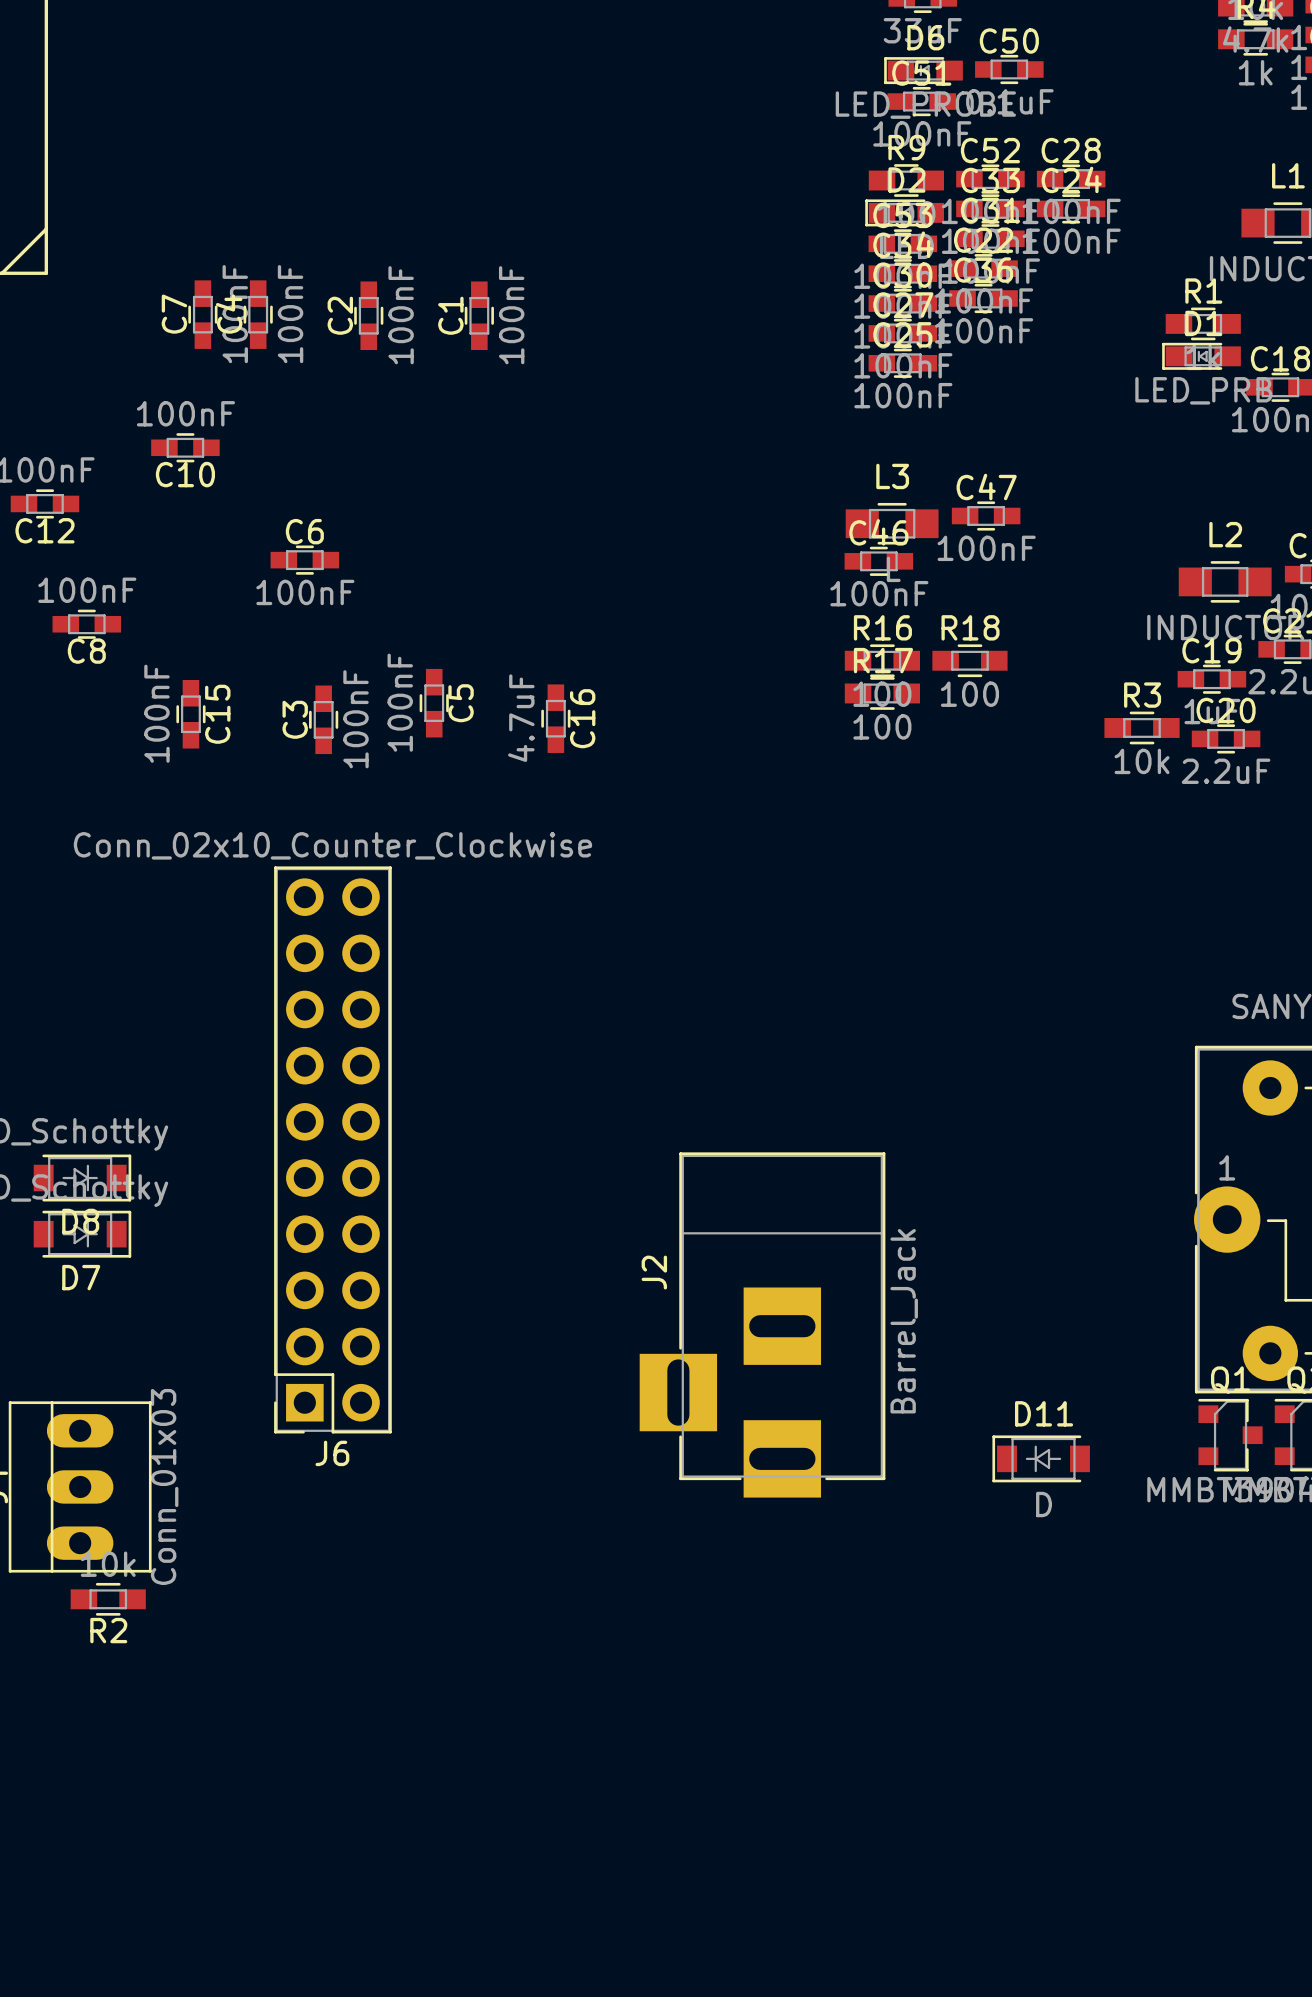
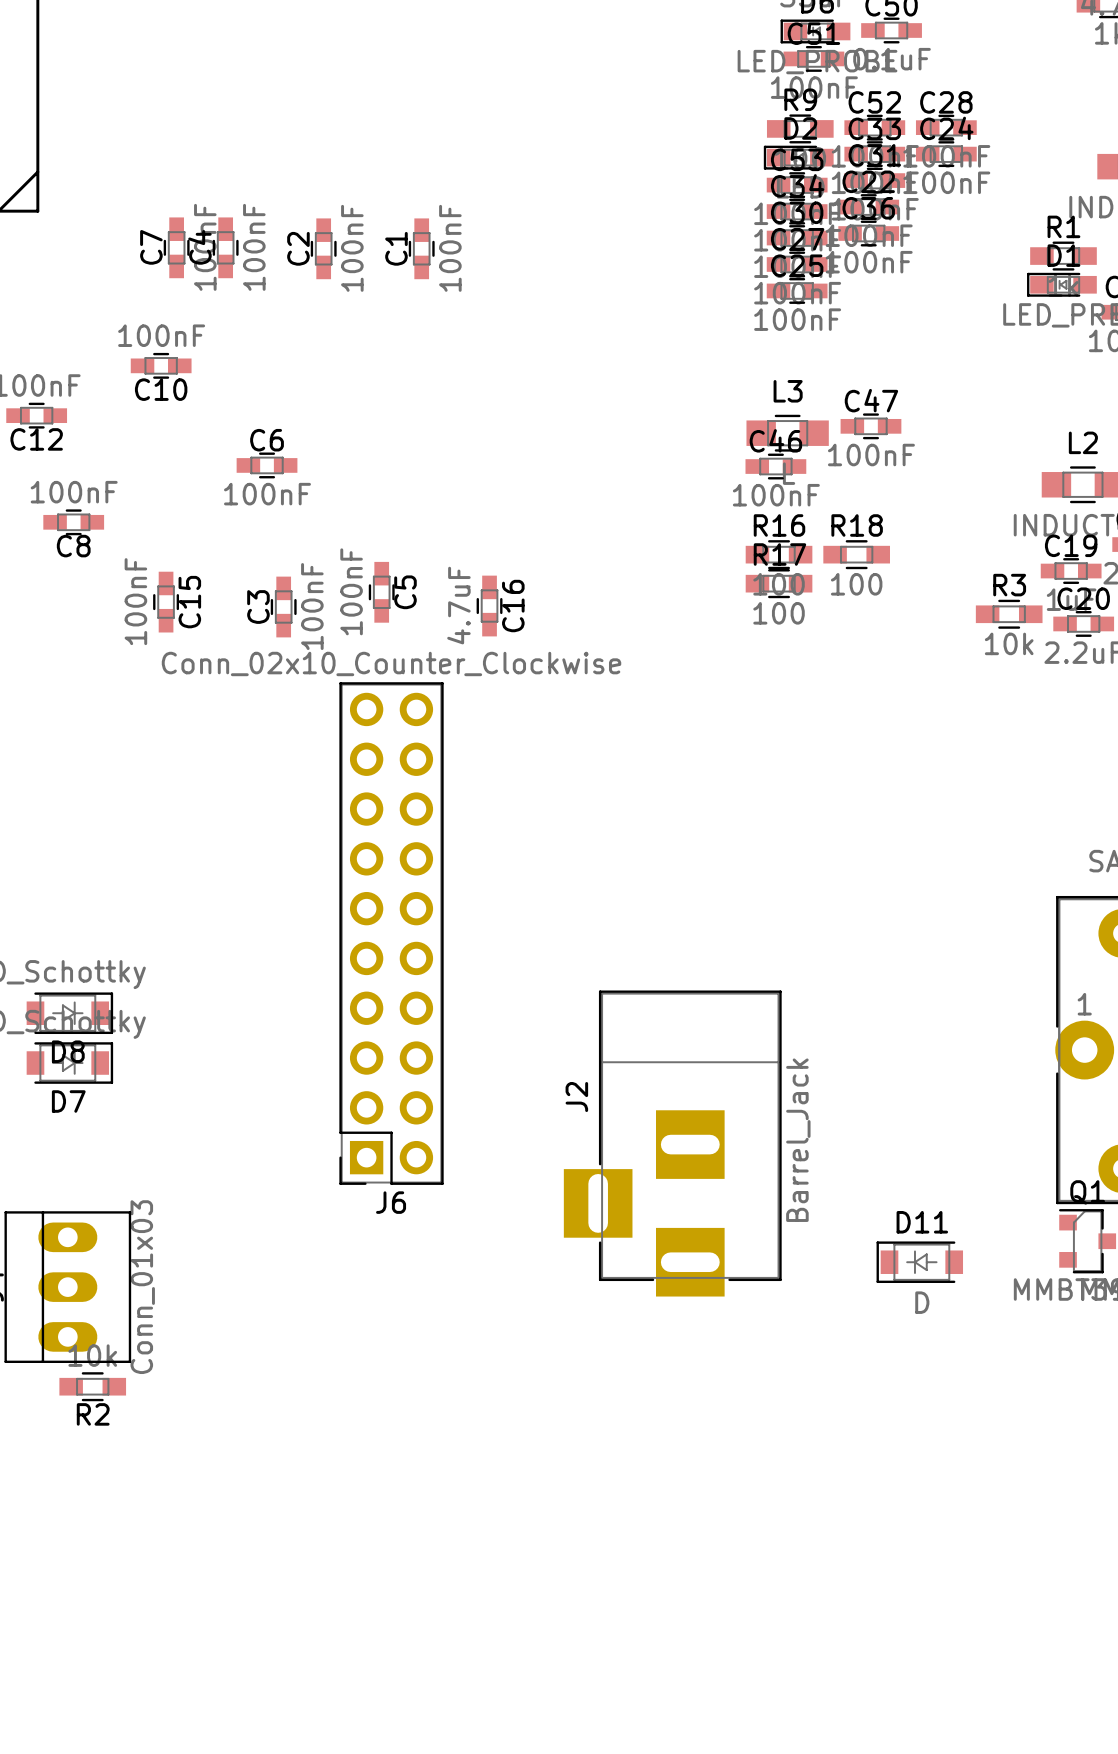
J6 position: (332, 1149) -> (391, 933)

